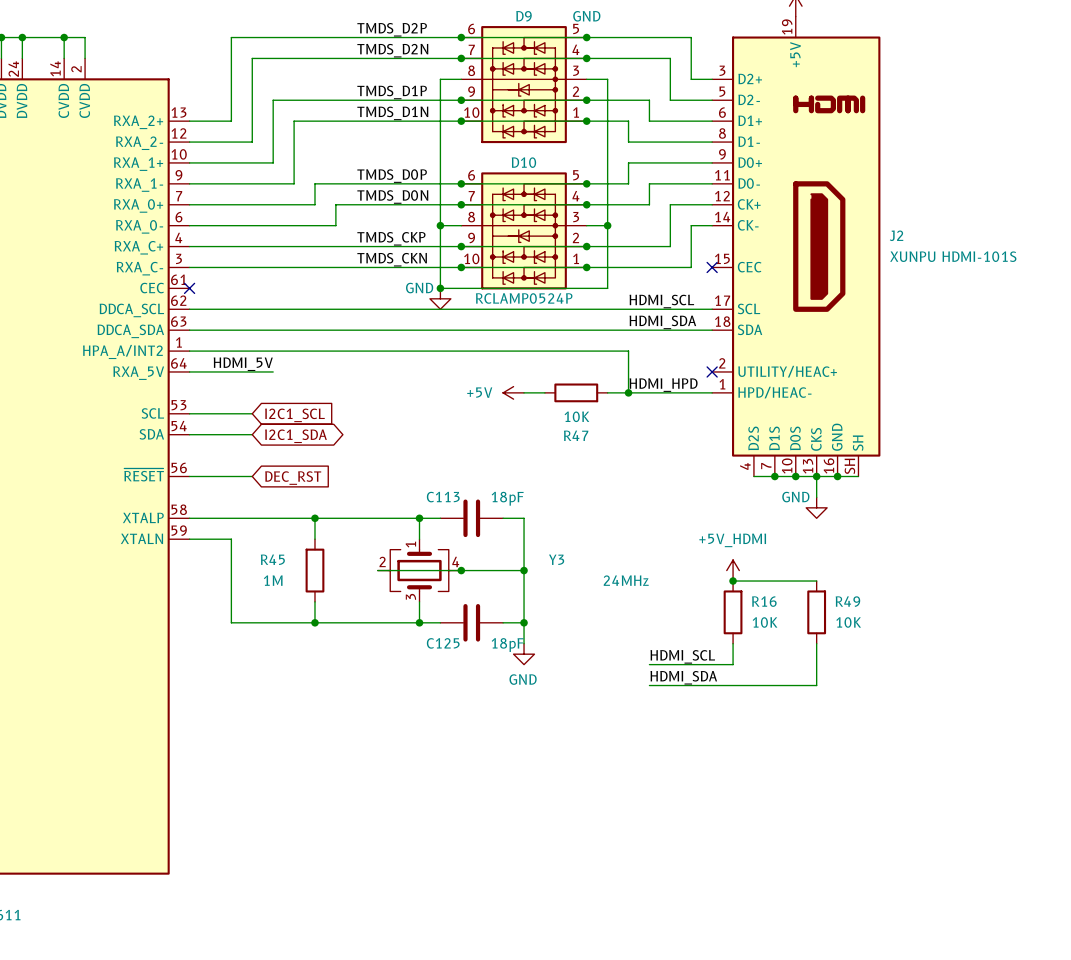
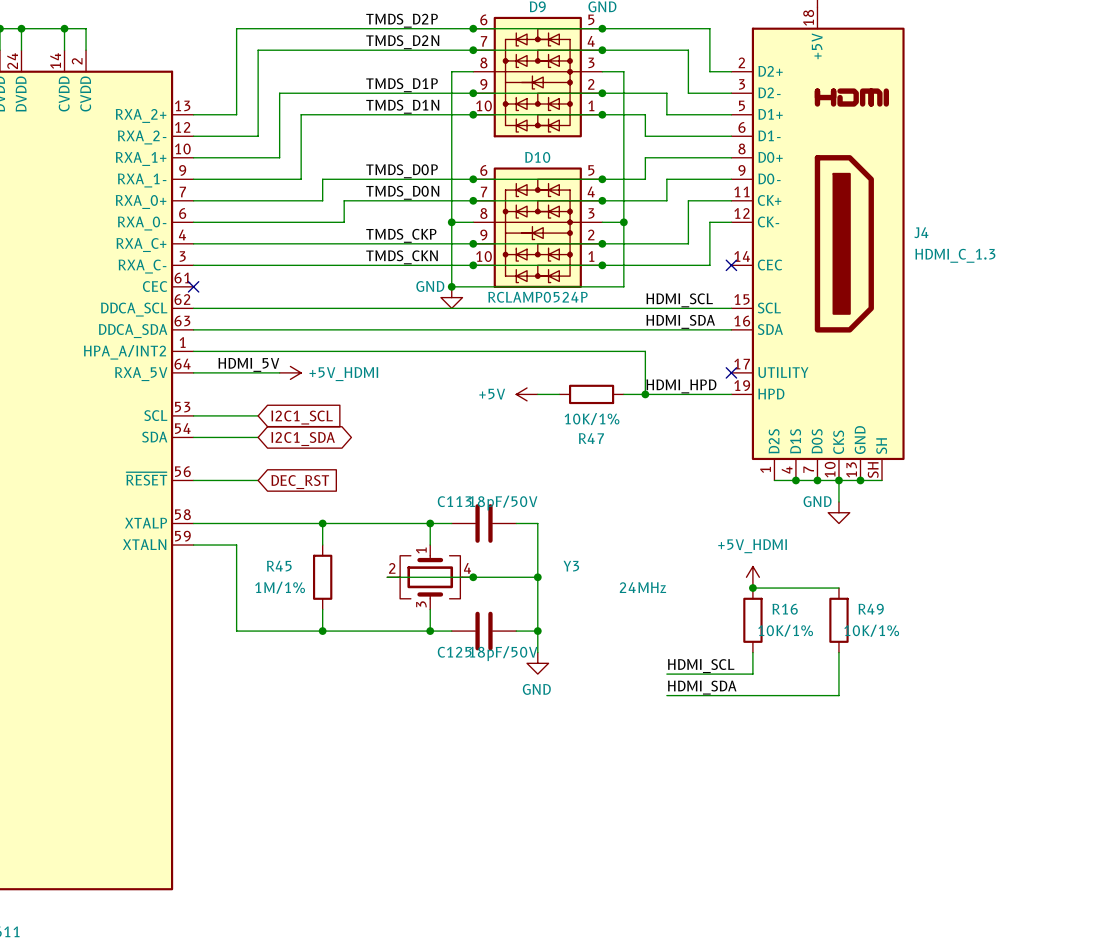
J2: XUNPU HDMI-101S (796, 246) -> none
J4: none -> HDMI_C_1.3 (818, 243)
power symbol: none -> +5V_HDMI (290, 372)
R47 value: 10K (576, 416) -> 10K/1% (592, 419)
C113 value: 18pF (507, 498) -> 18pF/50V (503, 503)
R45 value: 1M (273, 580) -> 1M/1% (280, 587)
R16 value: 10K (765, 622) -> 10K/1% (785, 630)
R49 value: 10K (848, 622) -> 10K/1% (871, 630)
C125 value: 18pF (507, 645) -> 18pF/50V (503, 653)

